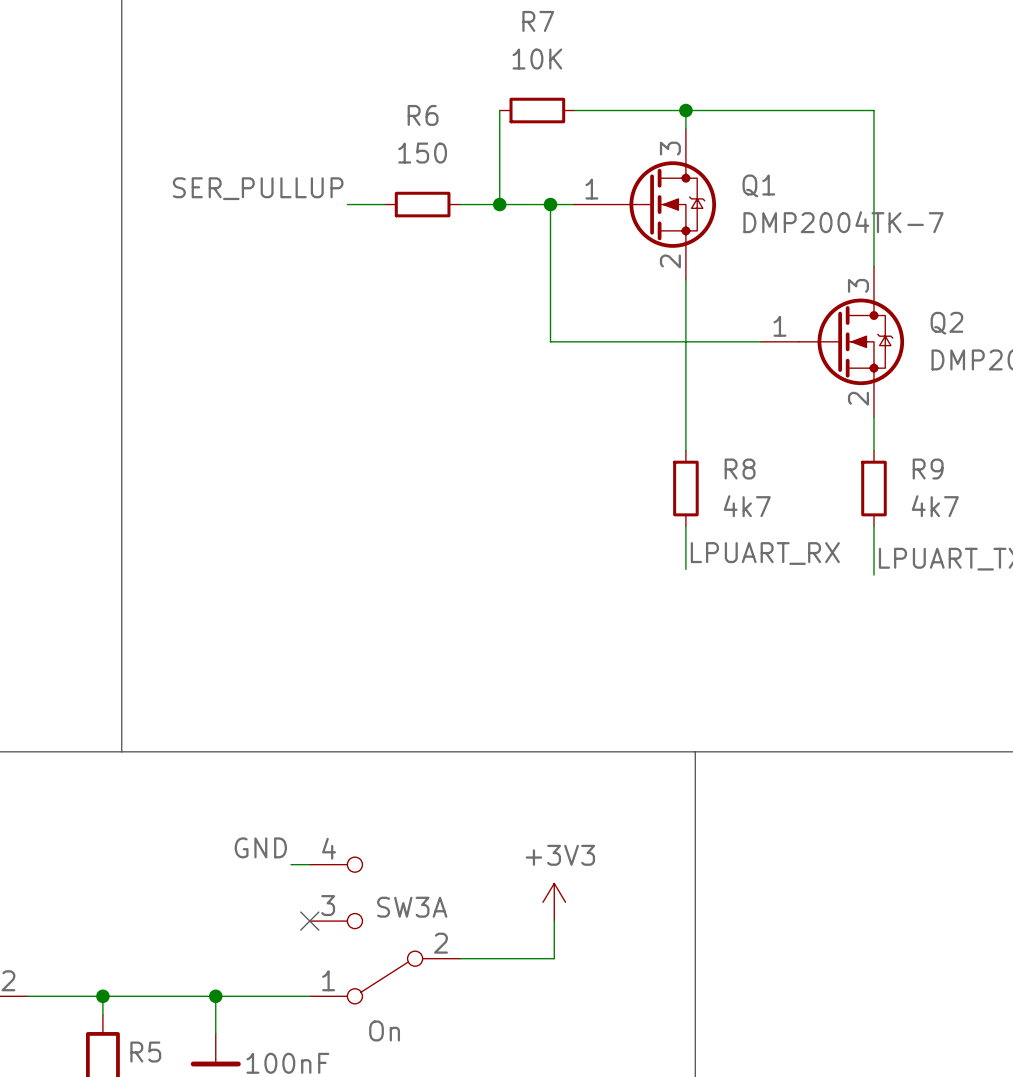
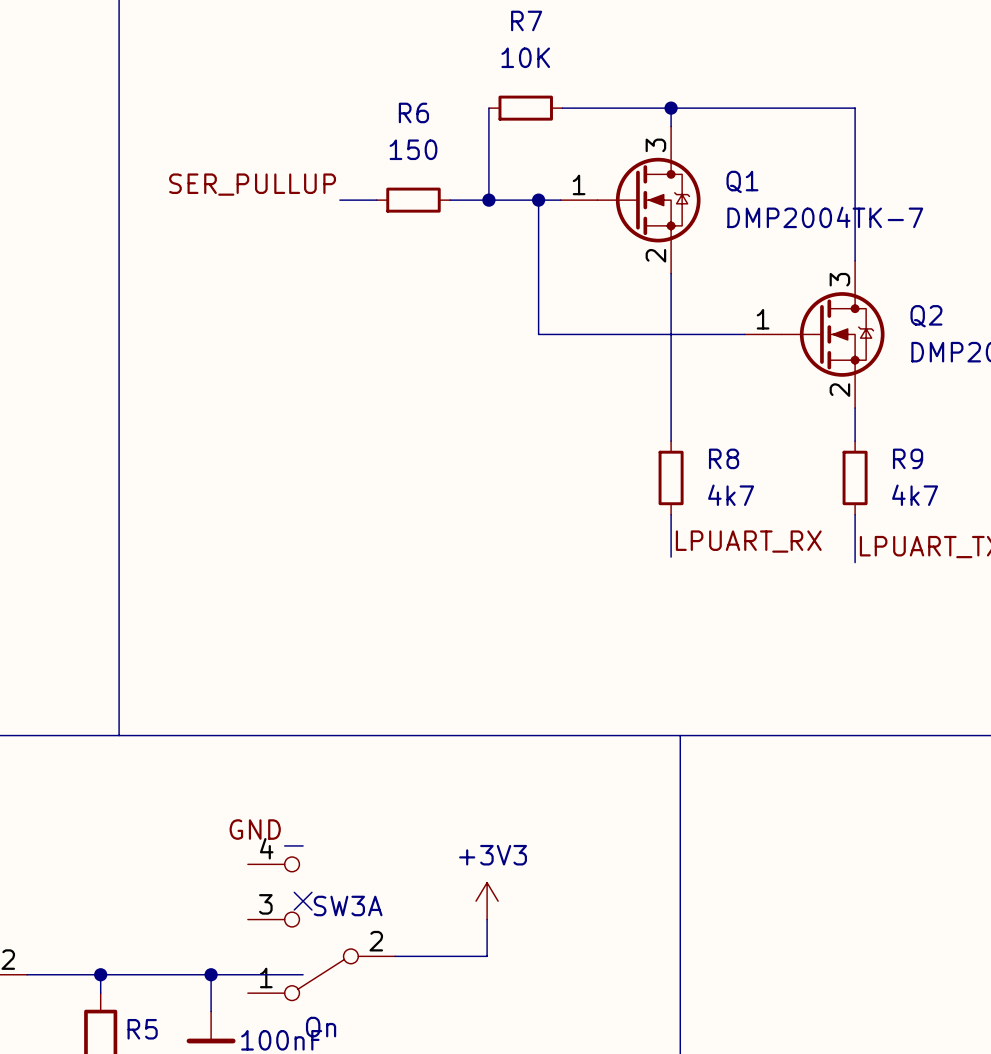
power symbol position: +3V3 (554, 902) -> +3V3 (487, 901)
wire: (554, 921) (554, 958) (460, 958) -> (487, 919) (487, 956) (395, 956)
SW3A position: (385, 930) -> (321, 928)

